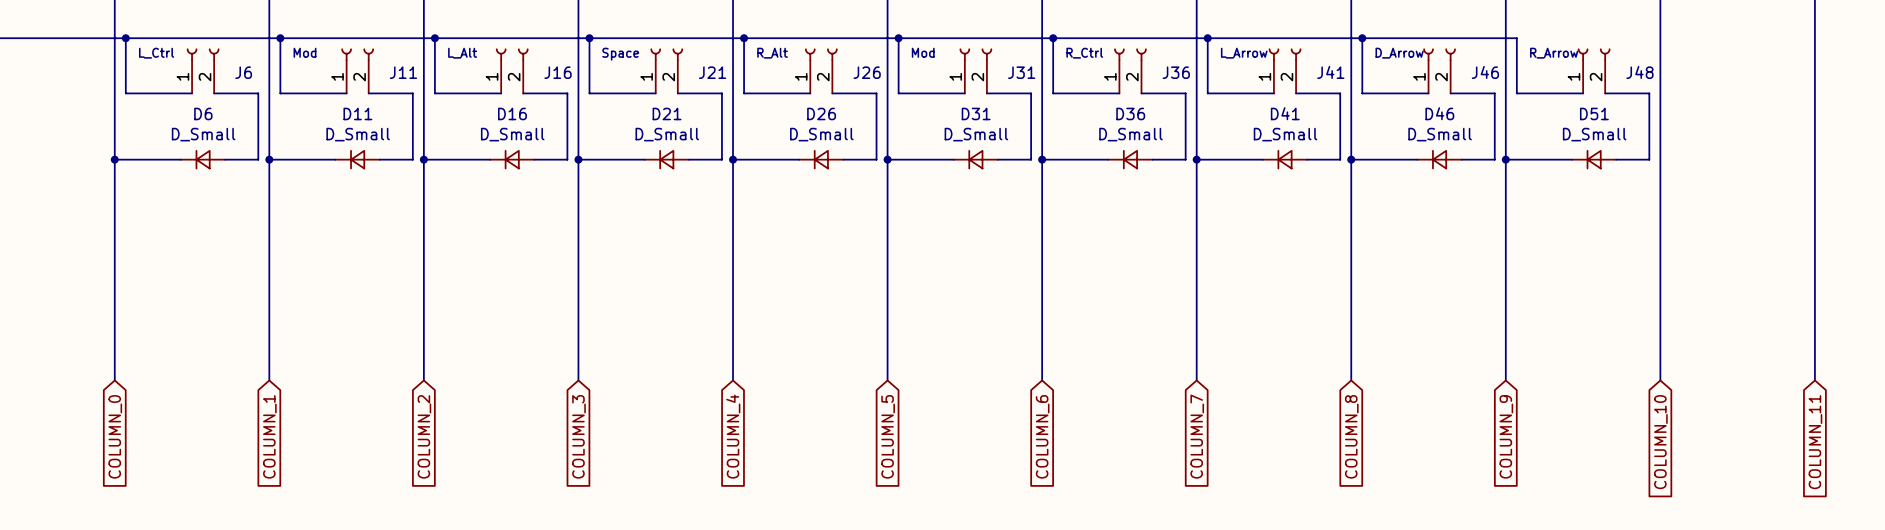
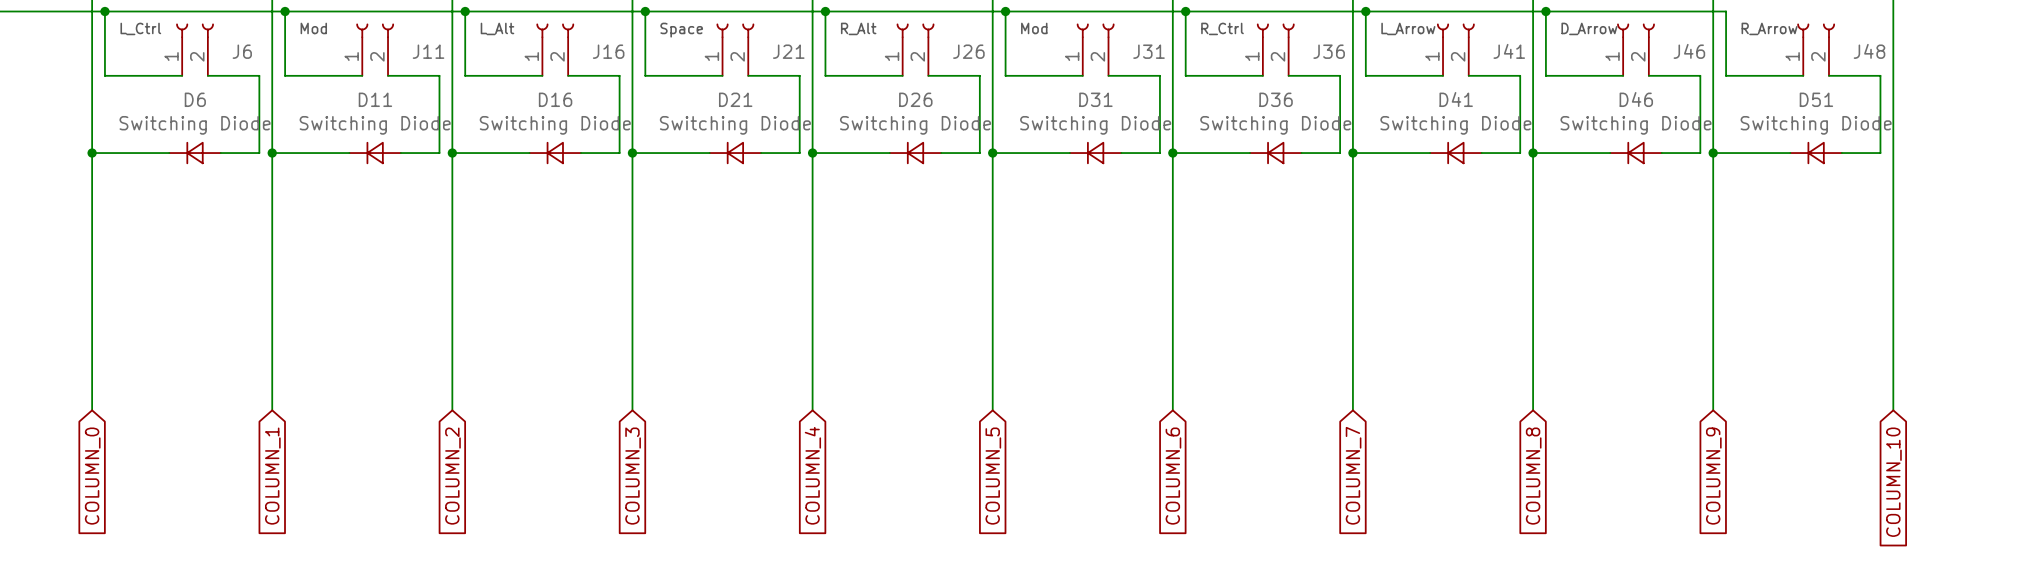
D6 value: D_Small (203, 134) -> Switching Diode (195, 125)
D11 value: D_Small (358, 134) -> Switching Diode (375, 125)
D16 value: D_Small (512, 134) -> Switching Diode (555, 125)
D21 value: D_Small (667, 134) -> Switching Diode (735, 125)
D26 value: D_Small (821, 134) -> Switching Diode (915, 125)
D31 value: D_Small (976, 134) -> Switching Diode (1095, 125)
D36 value: D_Small (1130, 134) -> Switching Diode (1275, 125)
D41 value: D_Small (1285, 134) -> Switching Diode (1455, 125)
D46 value: D_Small (1440, 134) -> Switching Diode (1636, 125)
D51 value: D_Small (1594, 134) -> Switching Diode (1816, 125)

